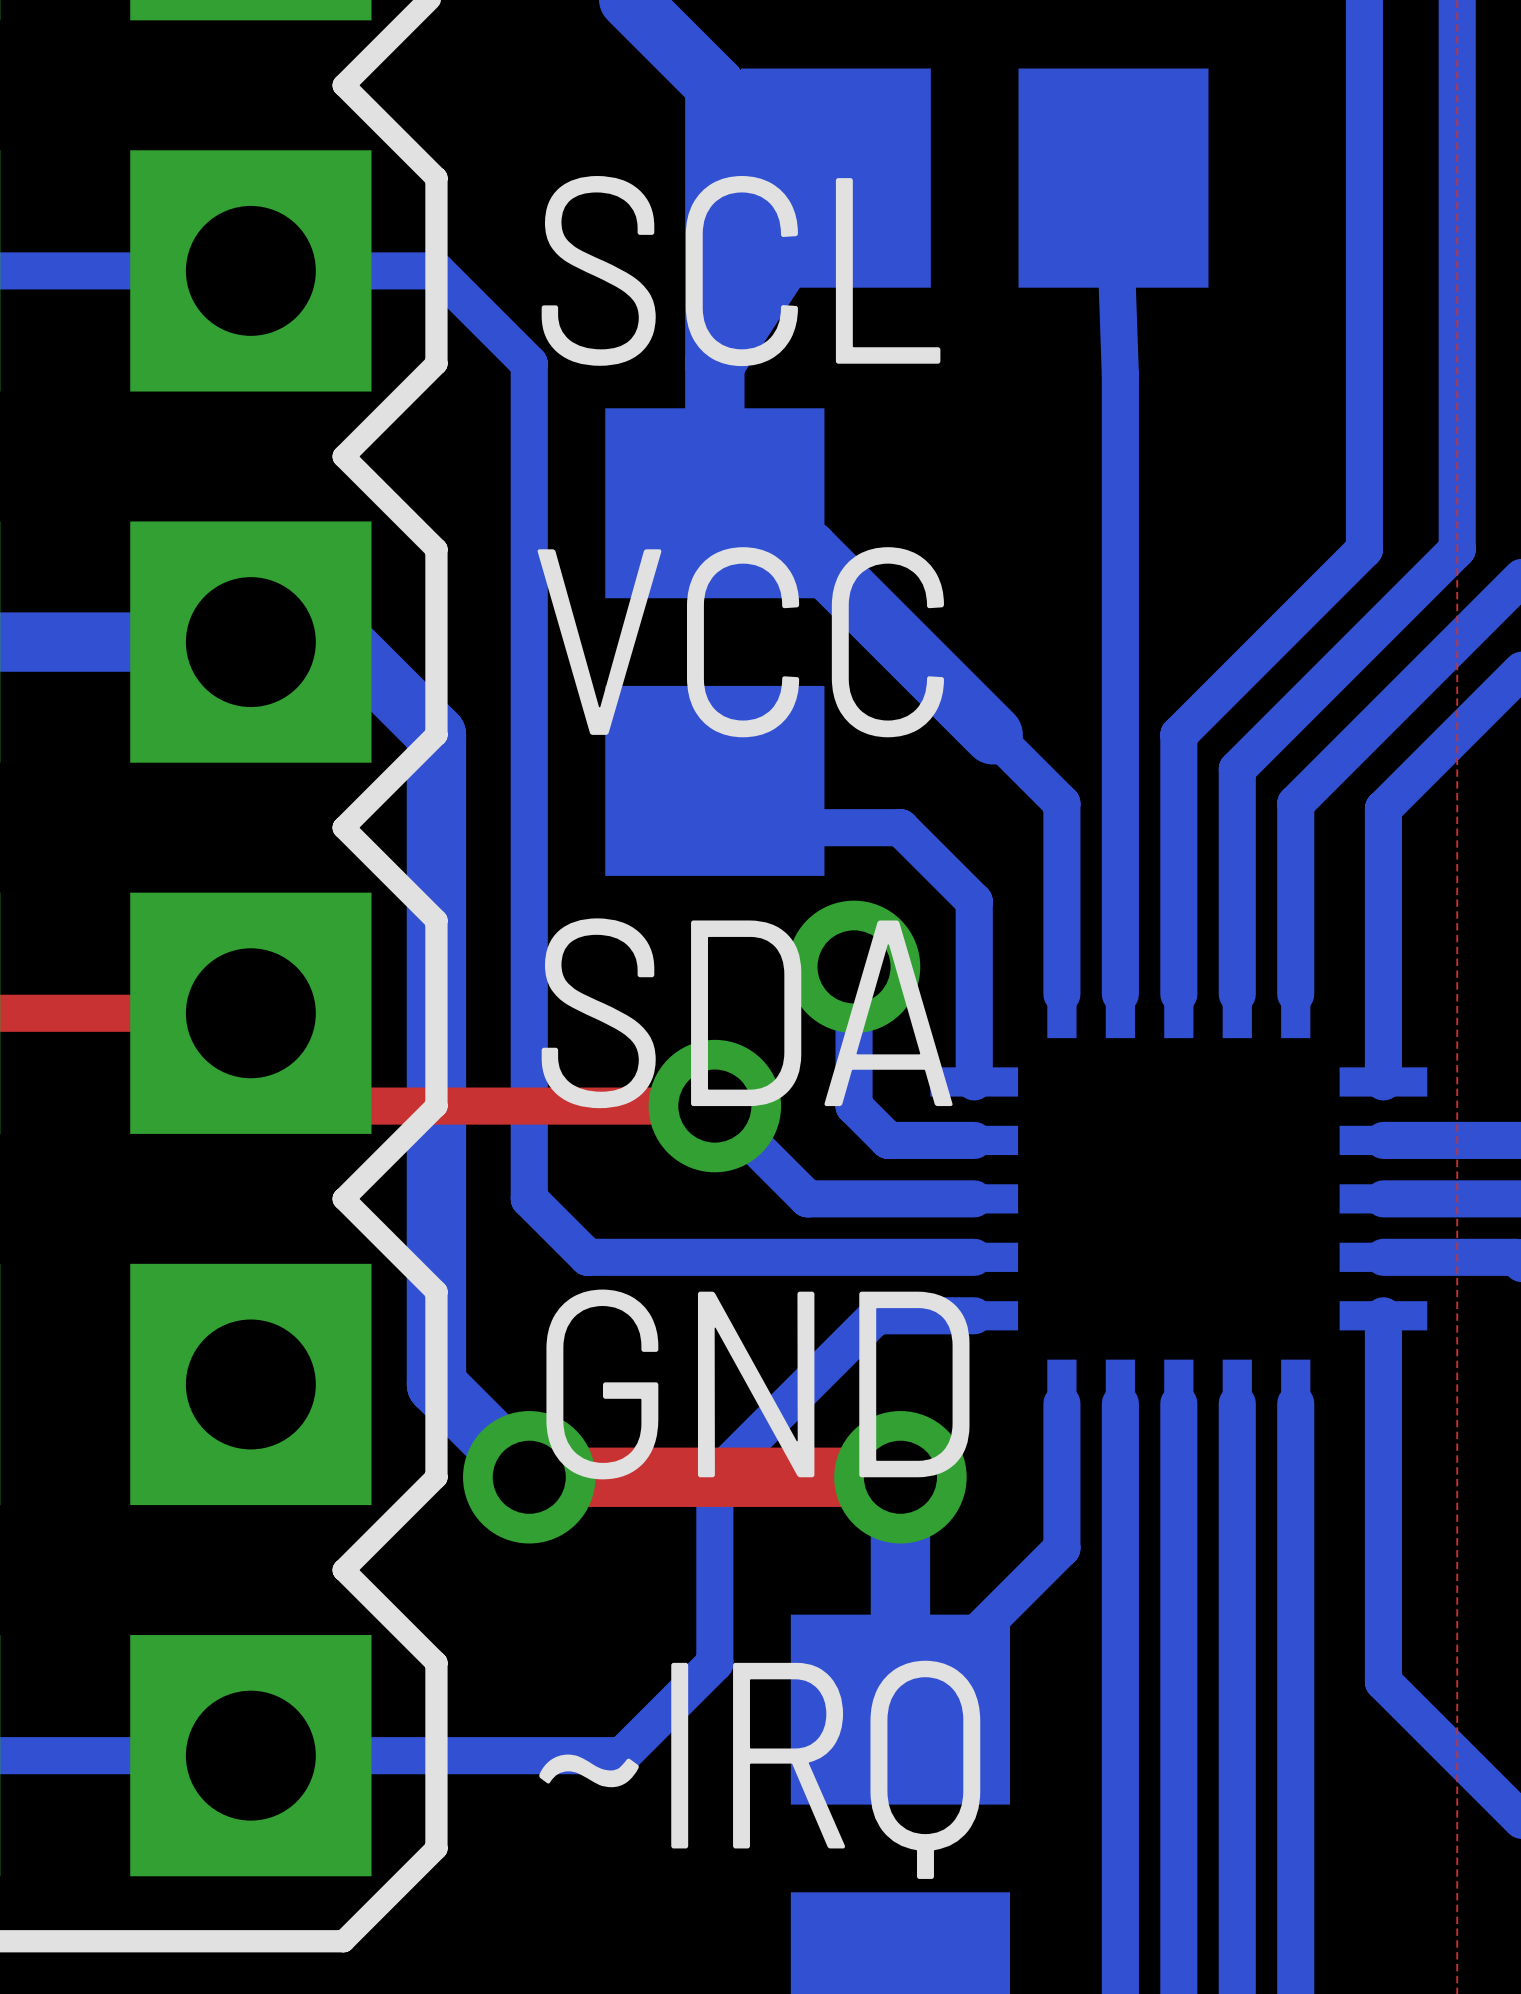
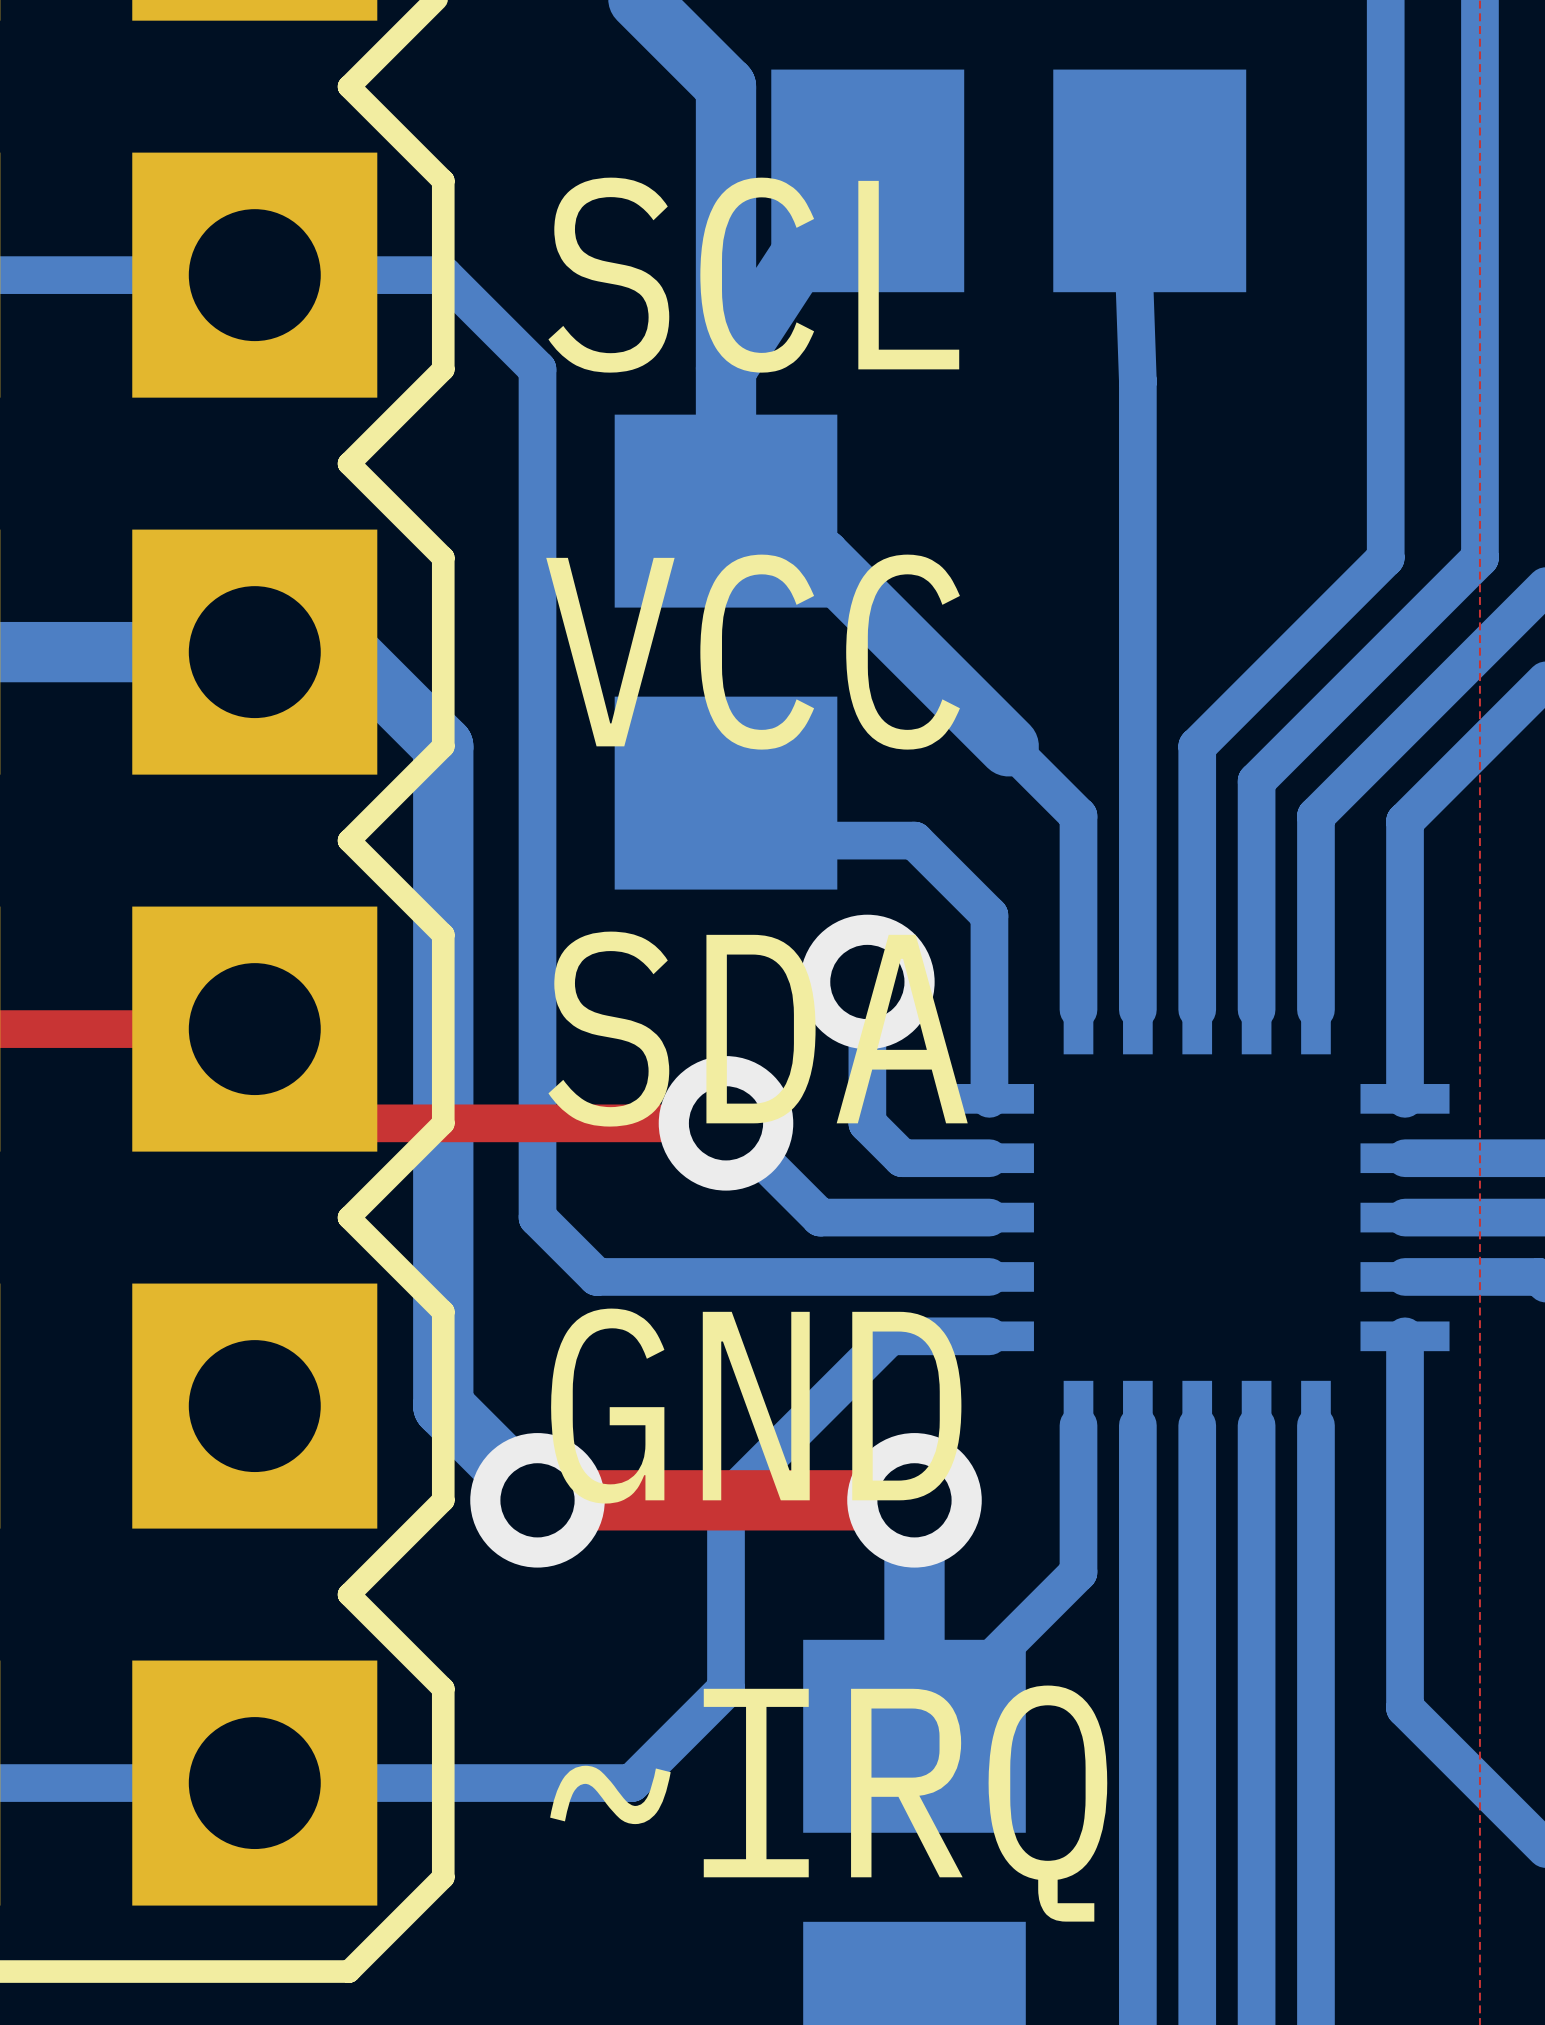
part position: (974, 178) -> (1008, 180)

